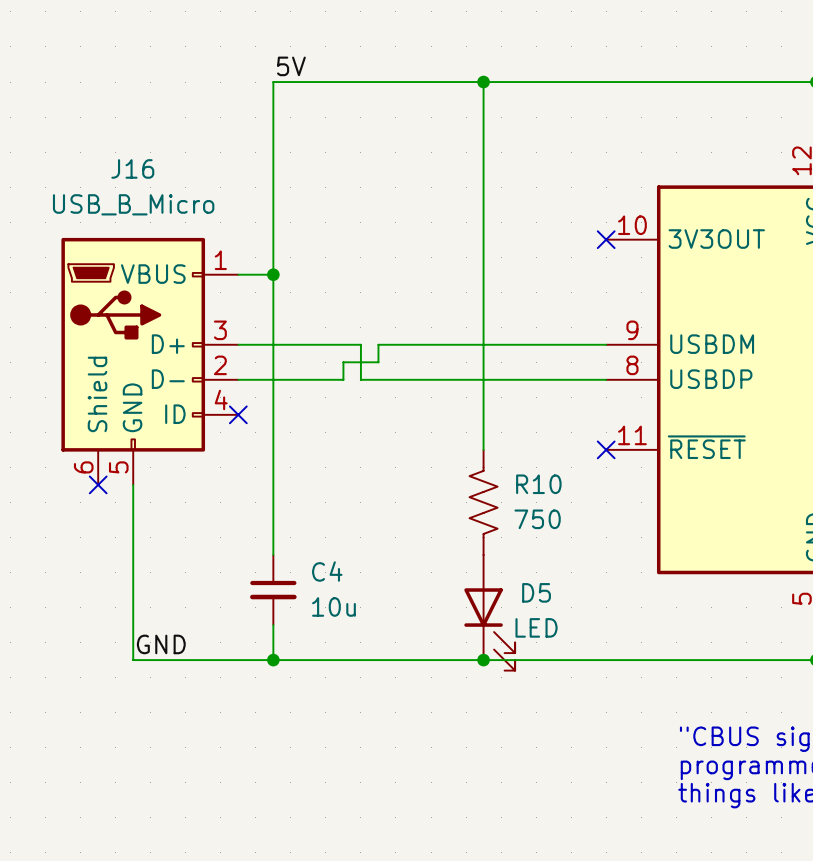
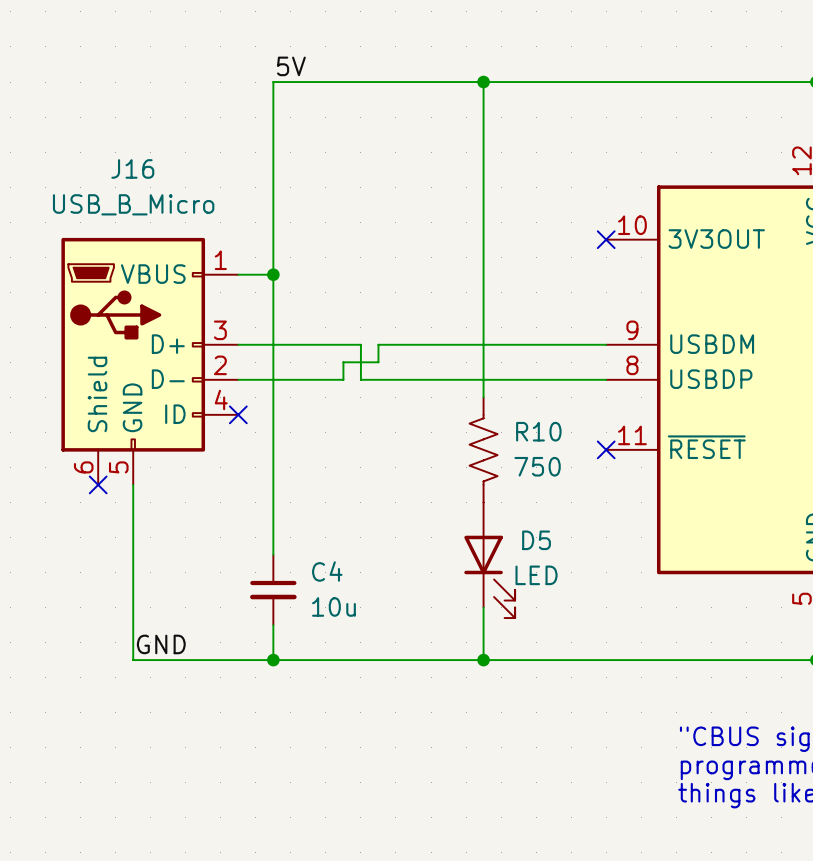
R10 position: (483, 502) -> (483, 449)
D5 position: (489, 612) -> (489, 560)

